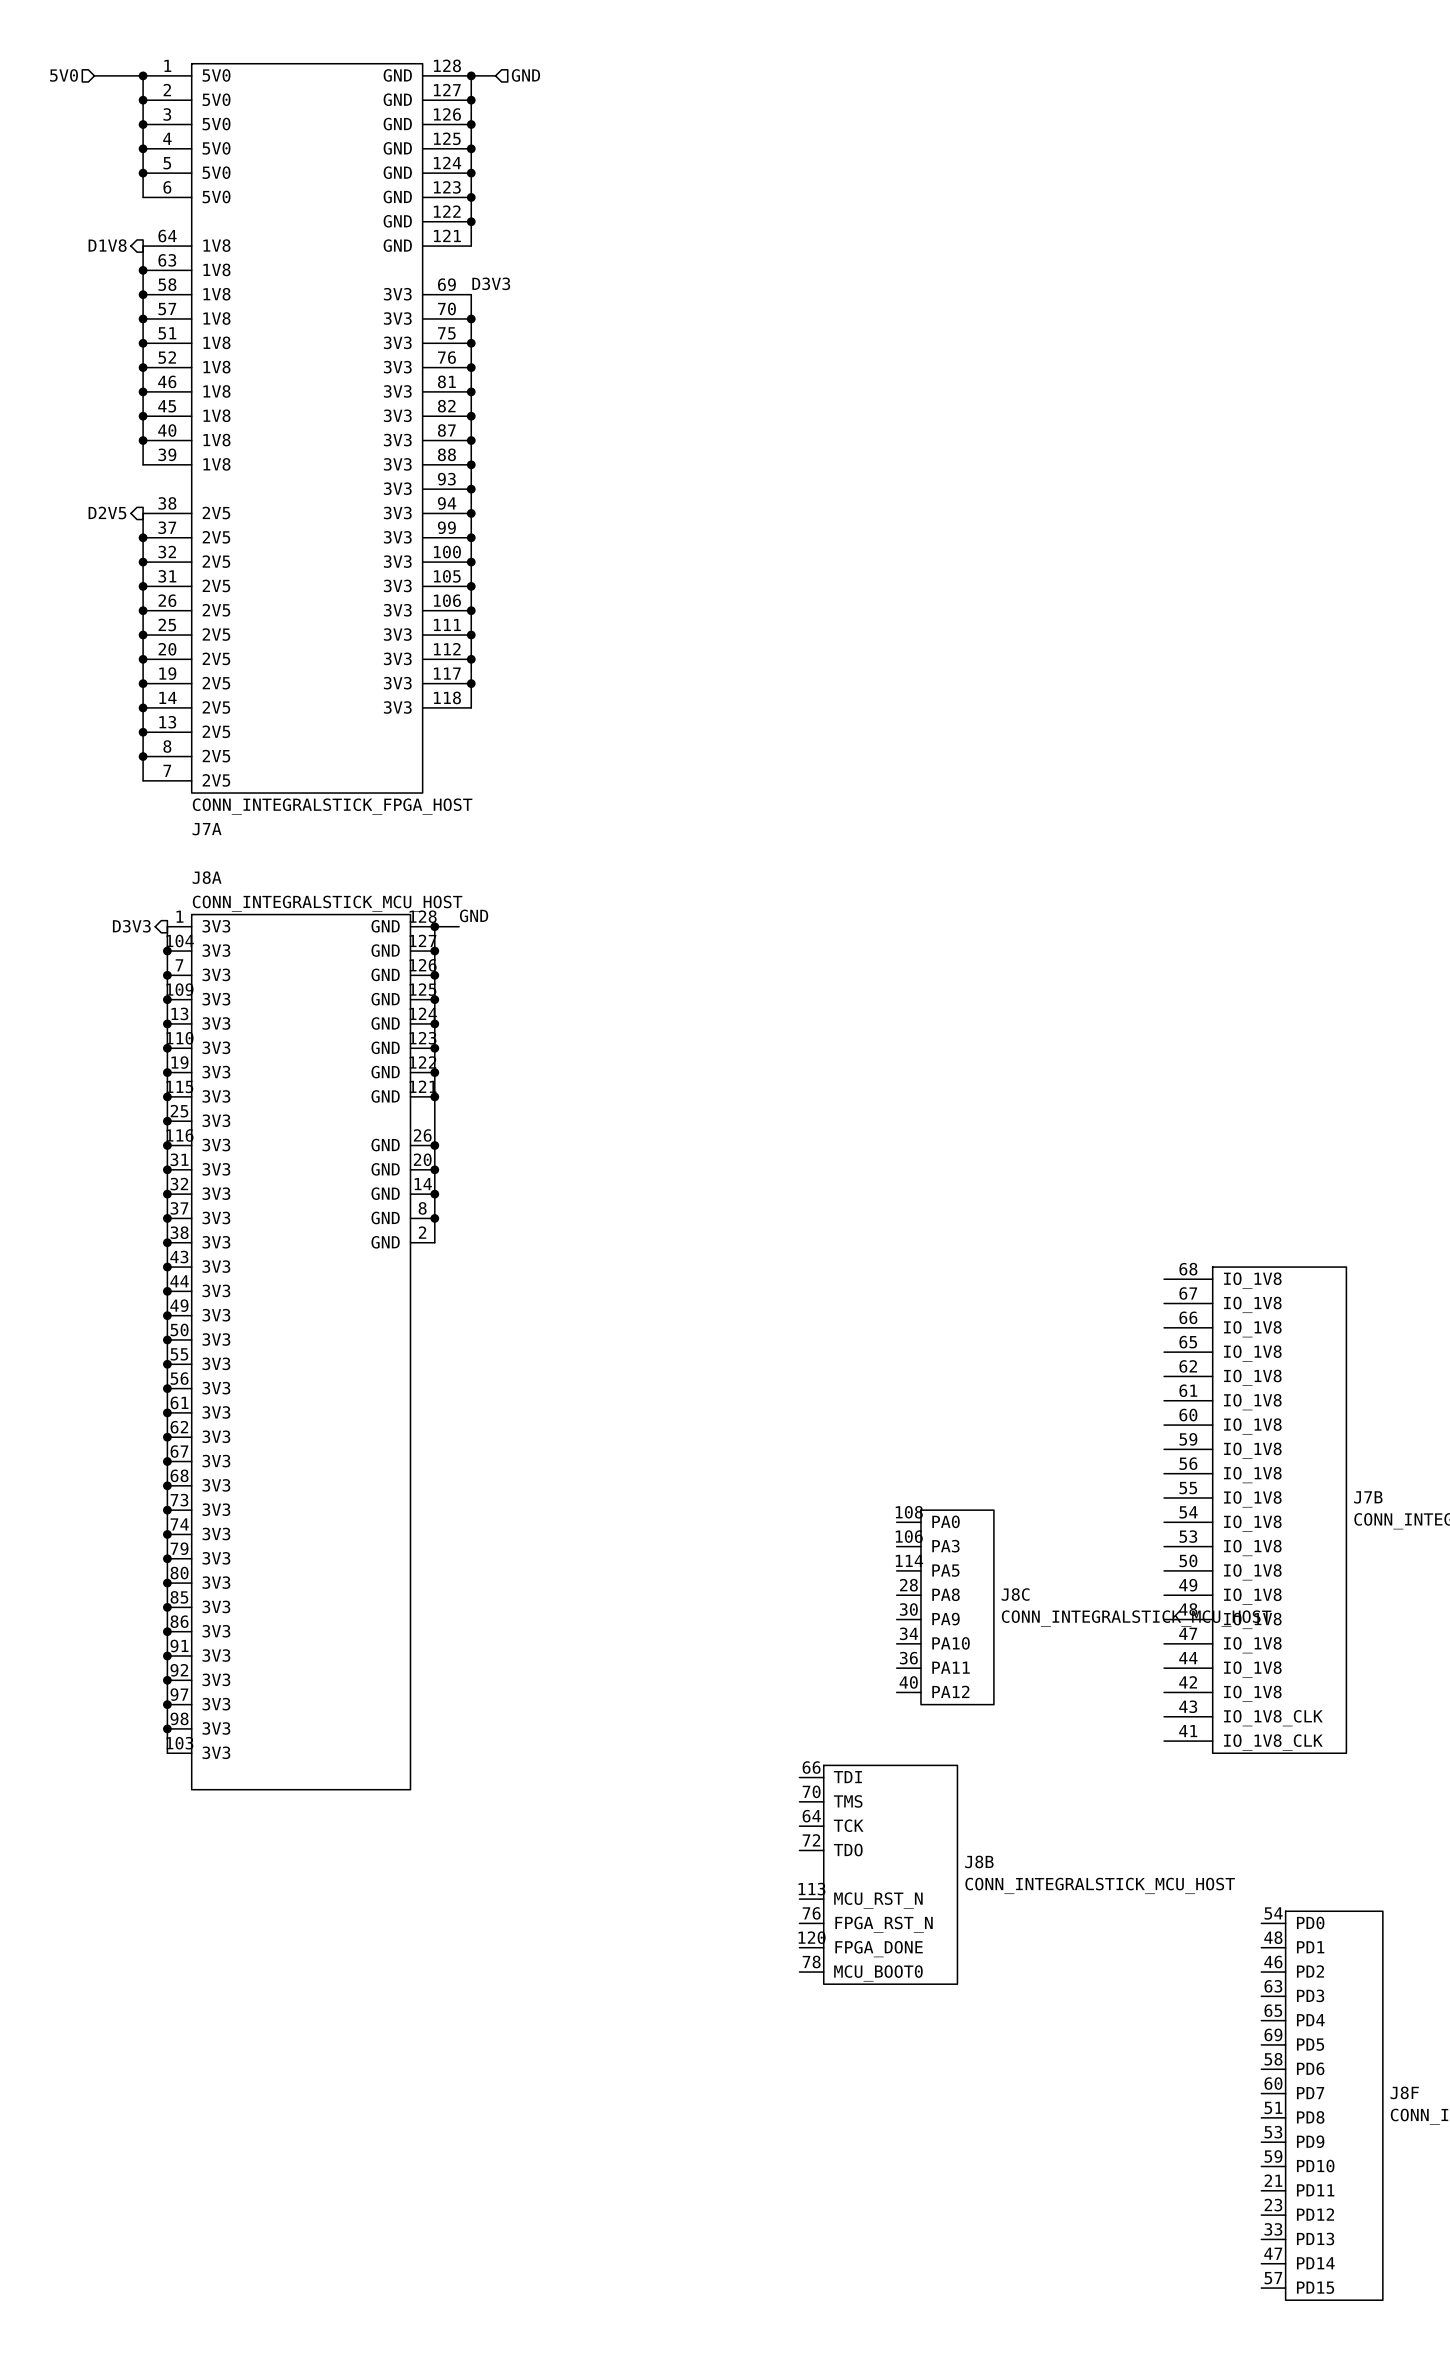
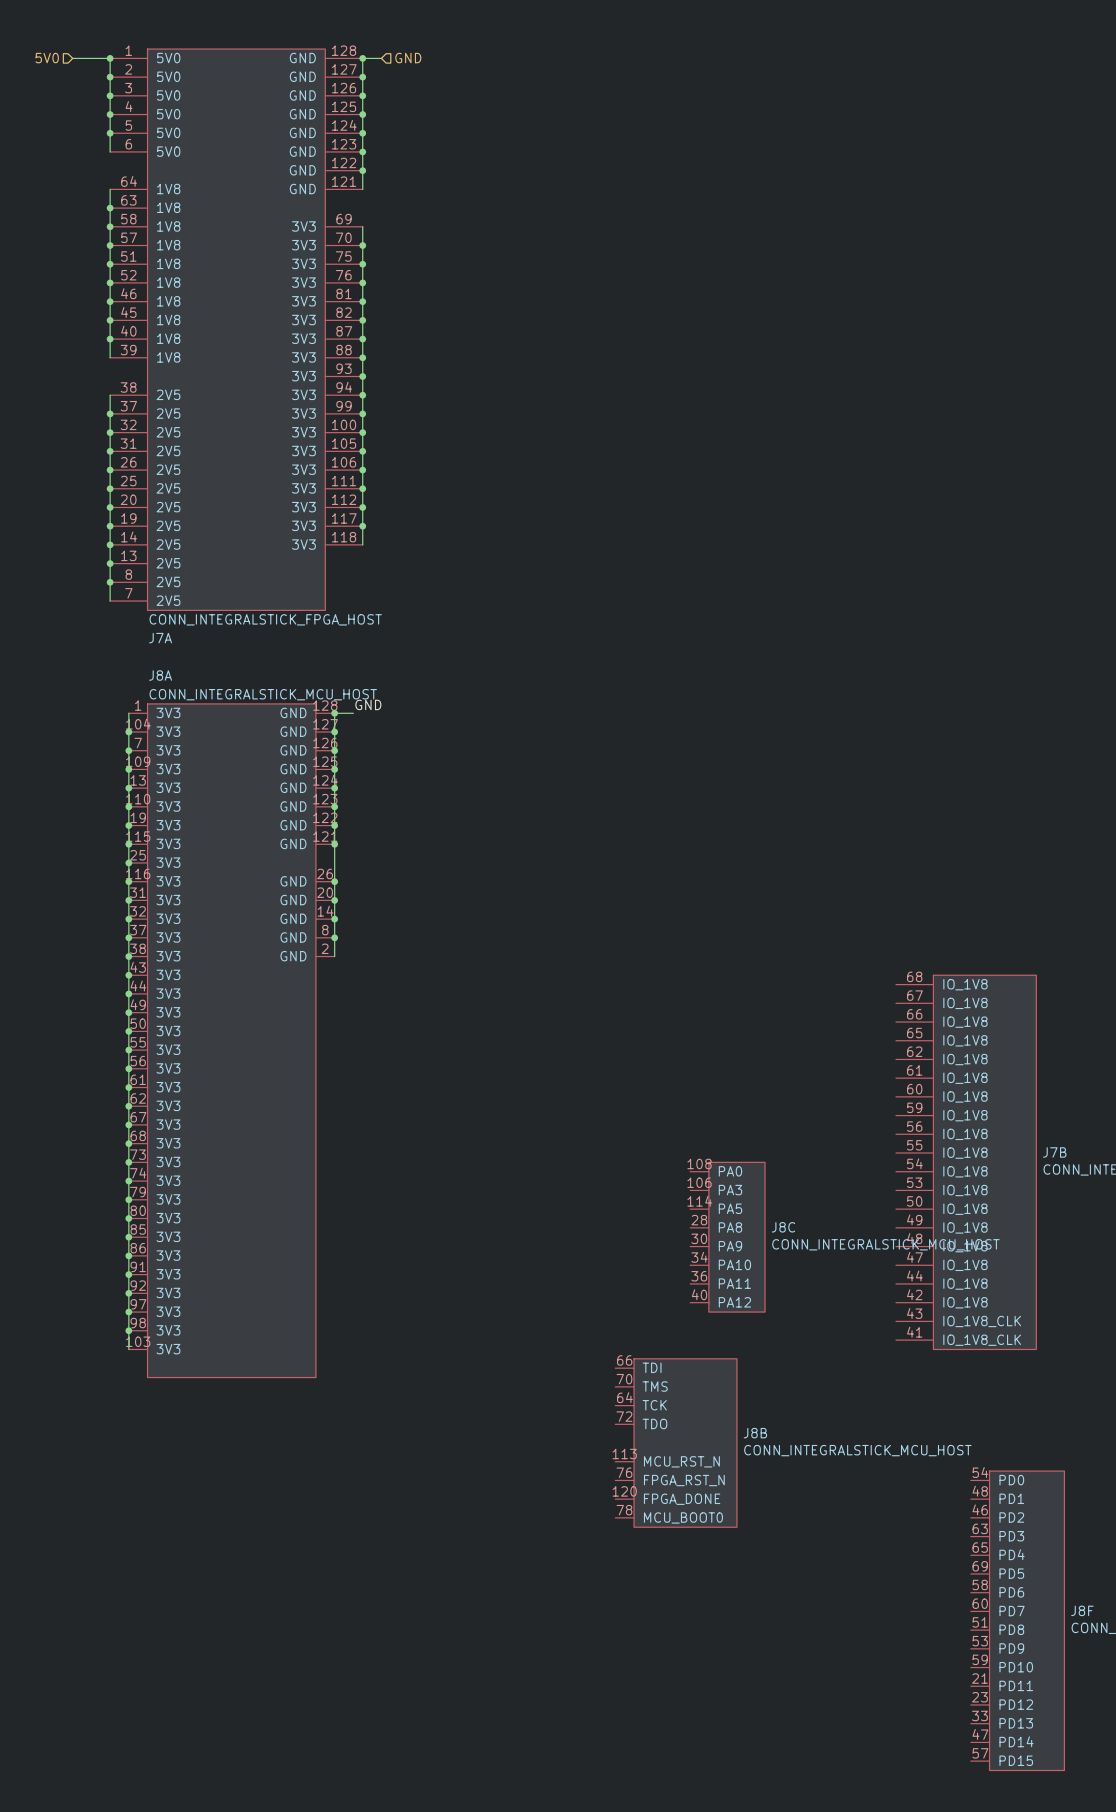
hierarchical label: D1V8 (107, 245) -> none
label: D3V3 (491, 283) -> none
hierarchical label: D2V5 (107, 513) -> none
hierarchical label: D3V3 (131, 926) -> none

